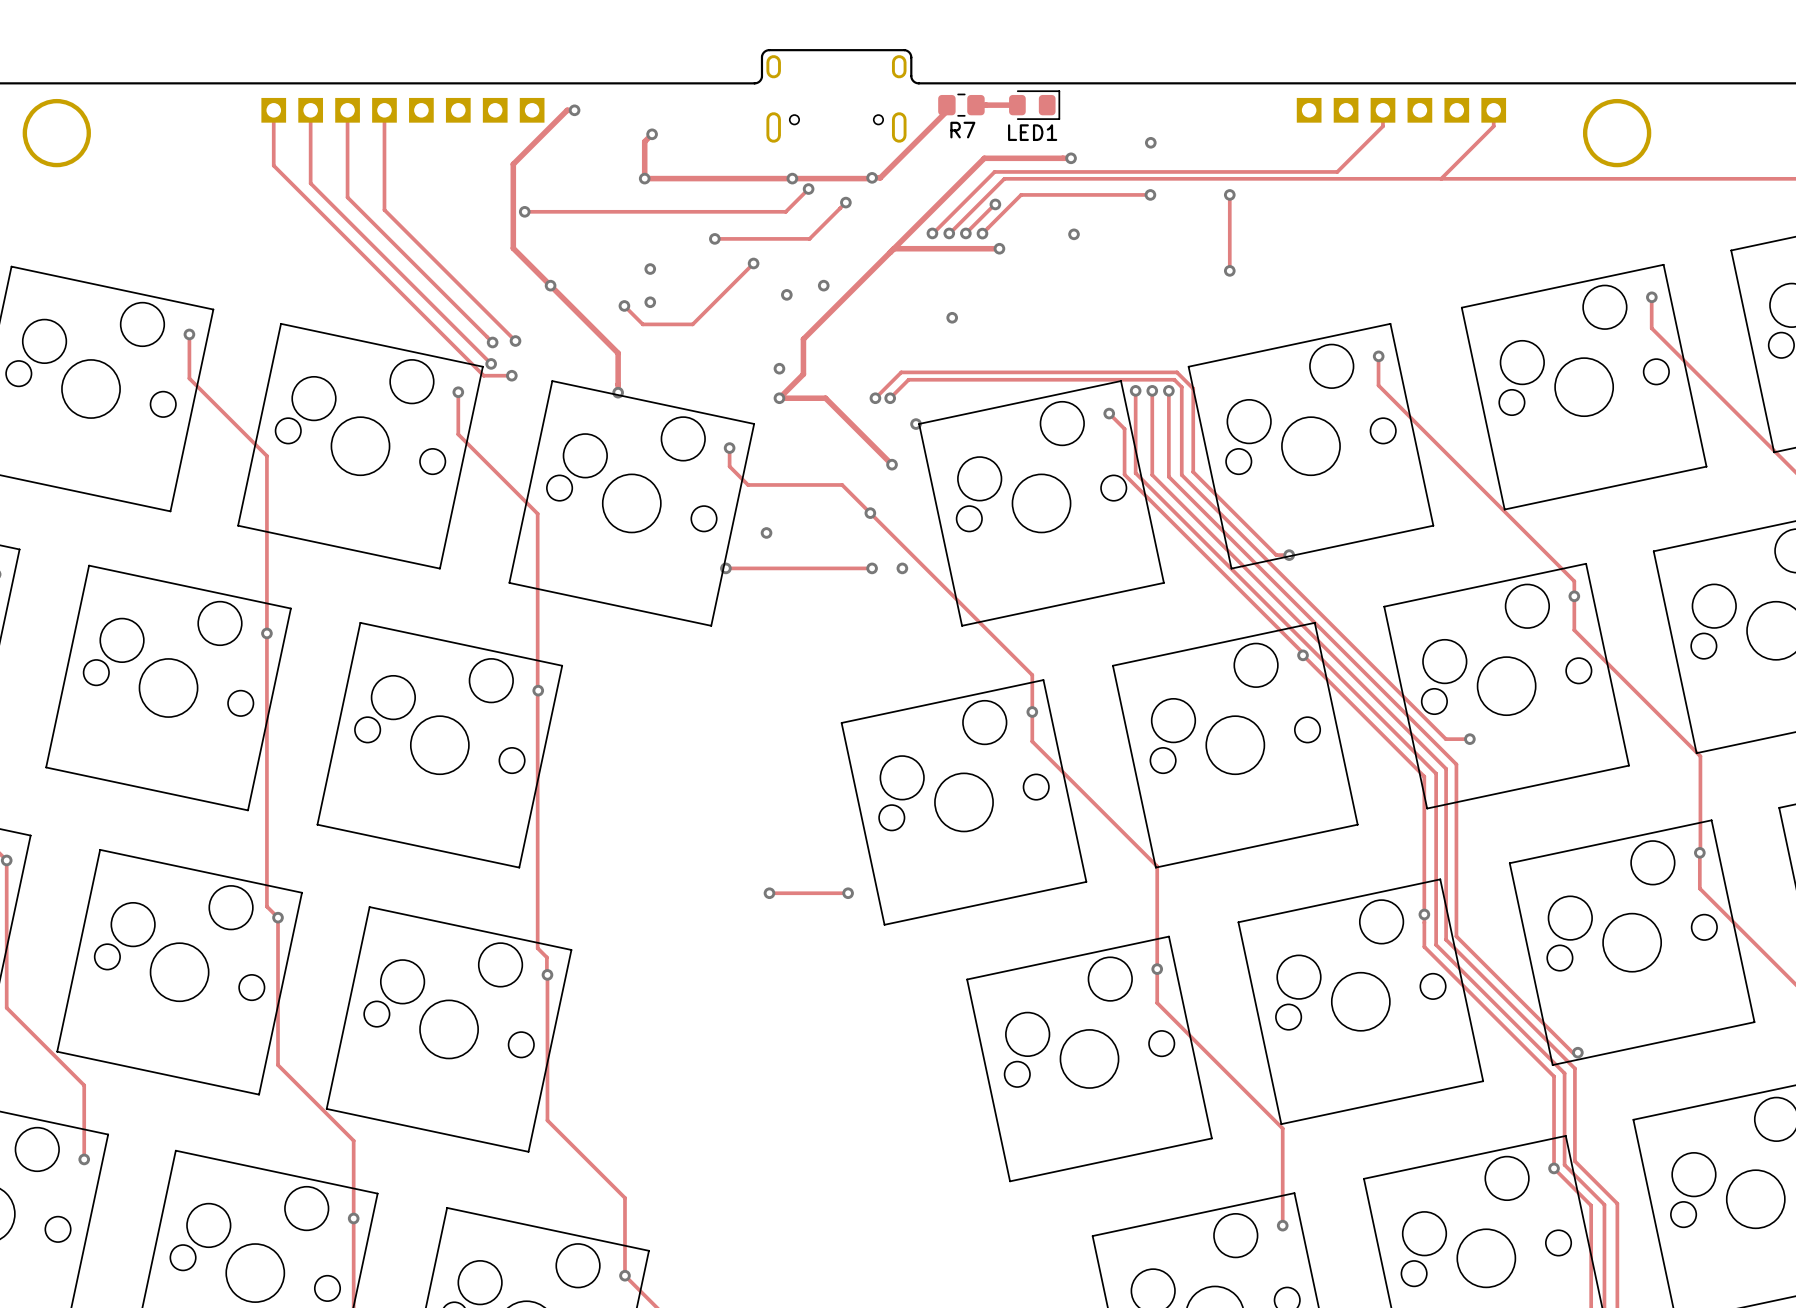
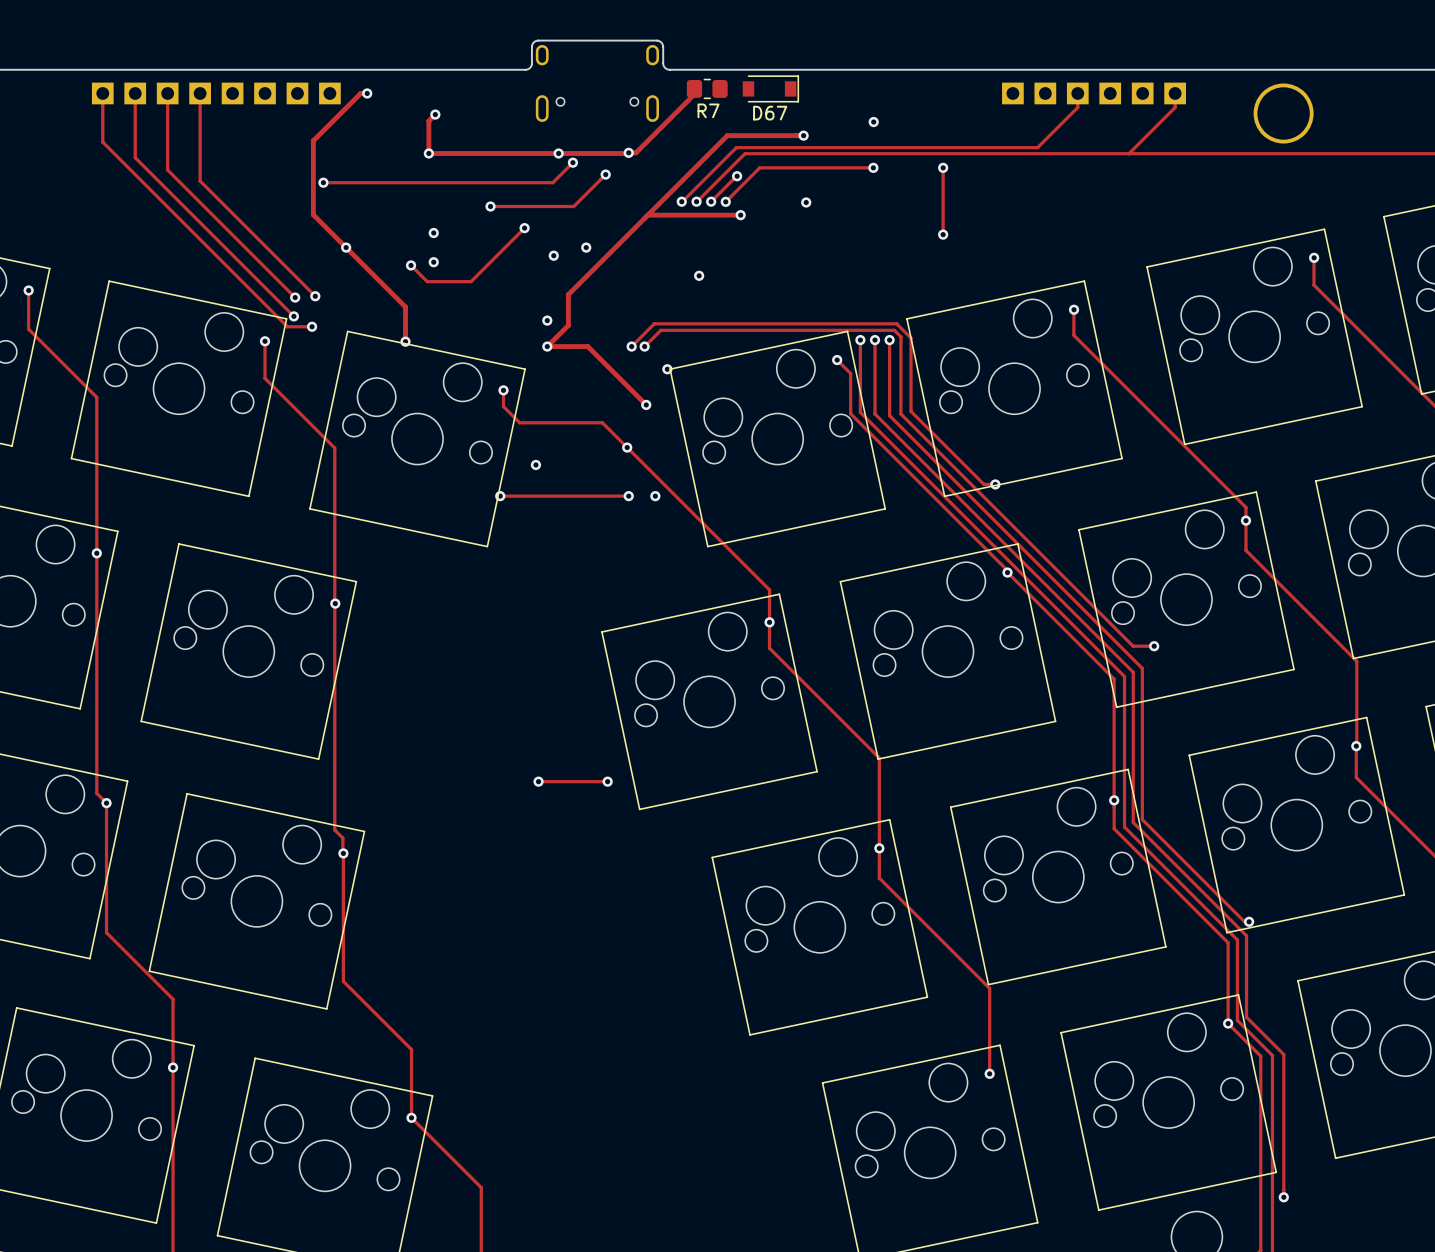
track: (975, 105) (1017, 105) -> none
D67: none -> (770, 88)
LED1: (1034, 105) -> none

